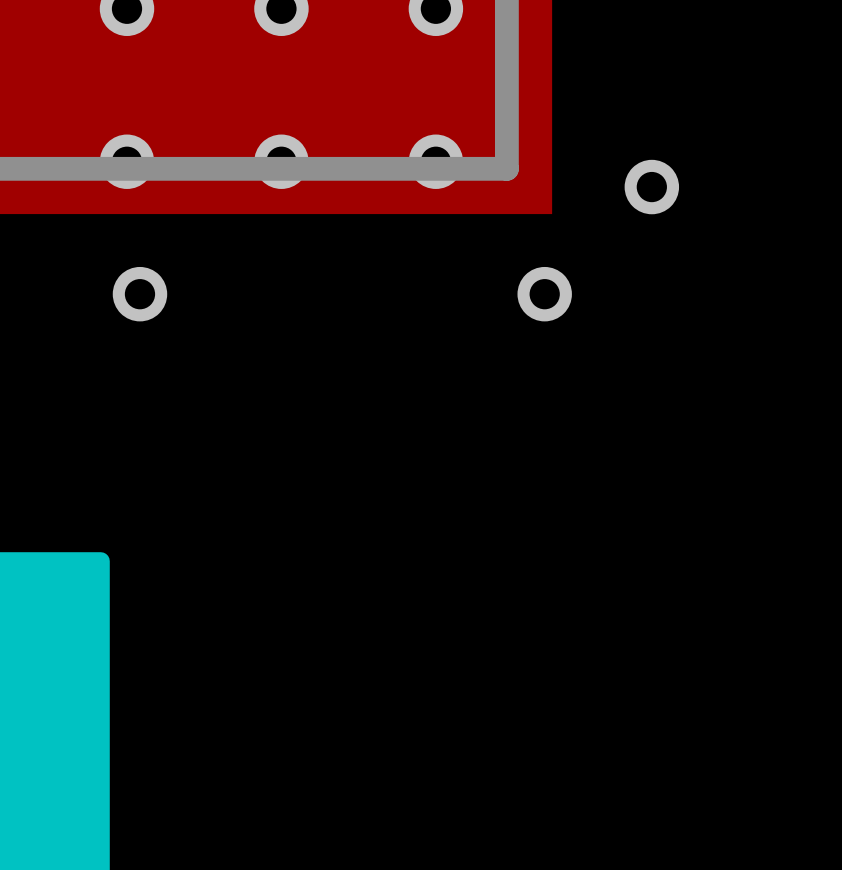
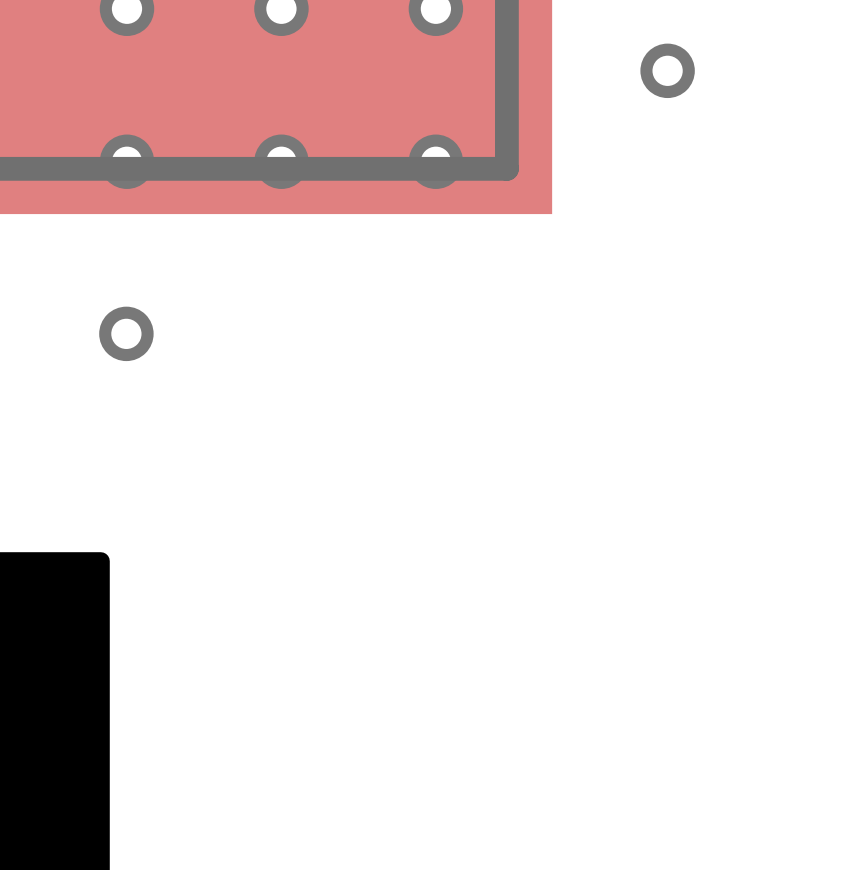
via position: (651, 187) -> (667, 70)
via position: (139, 294) -> (126, 333)
via: (544, 294) -> none

